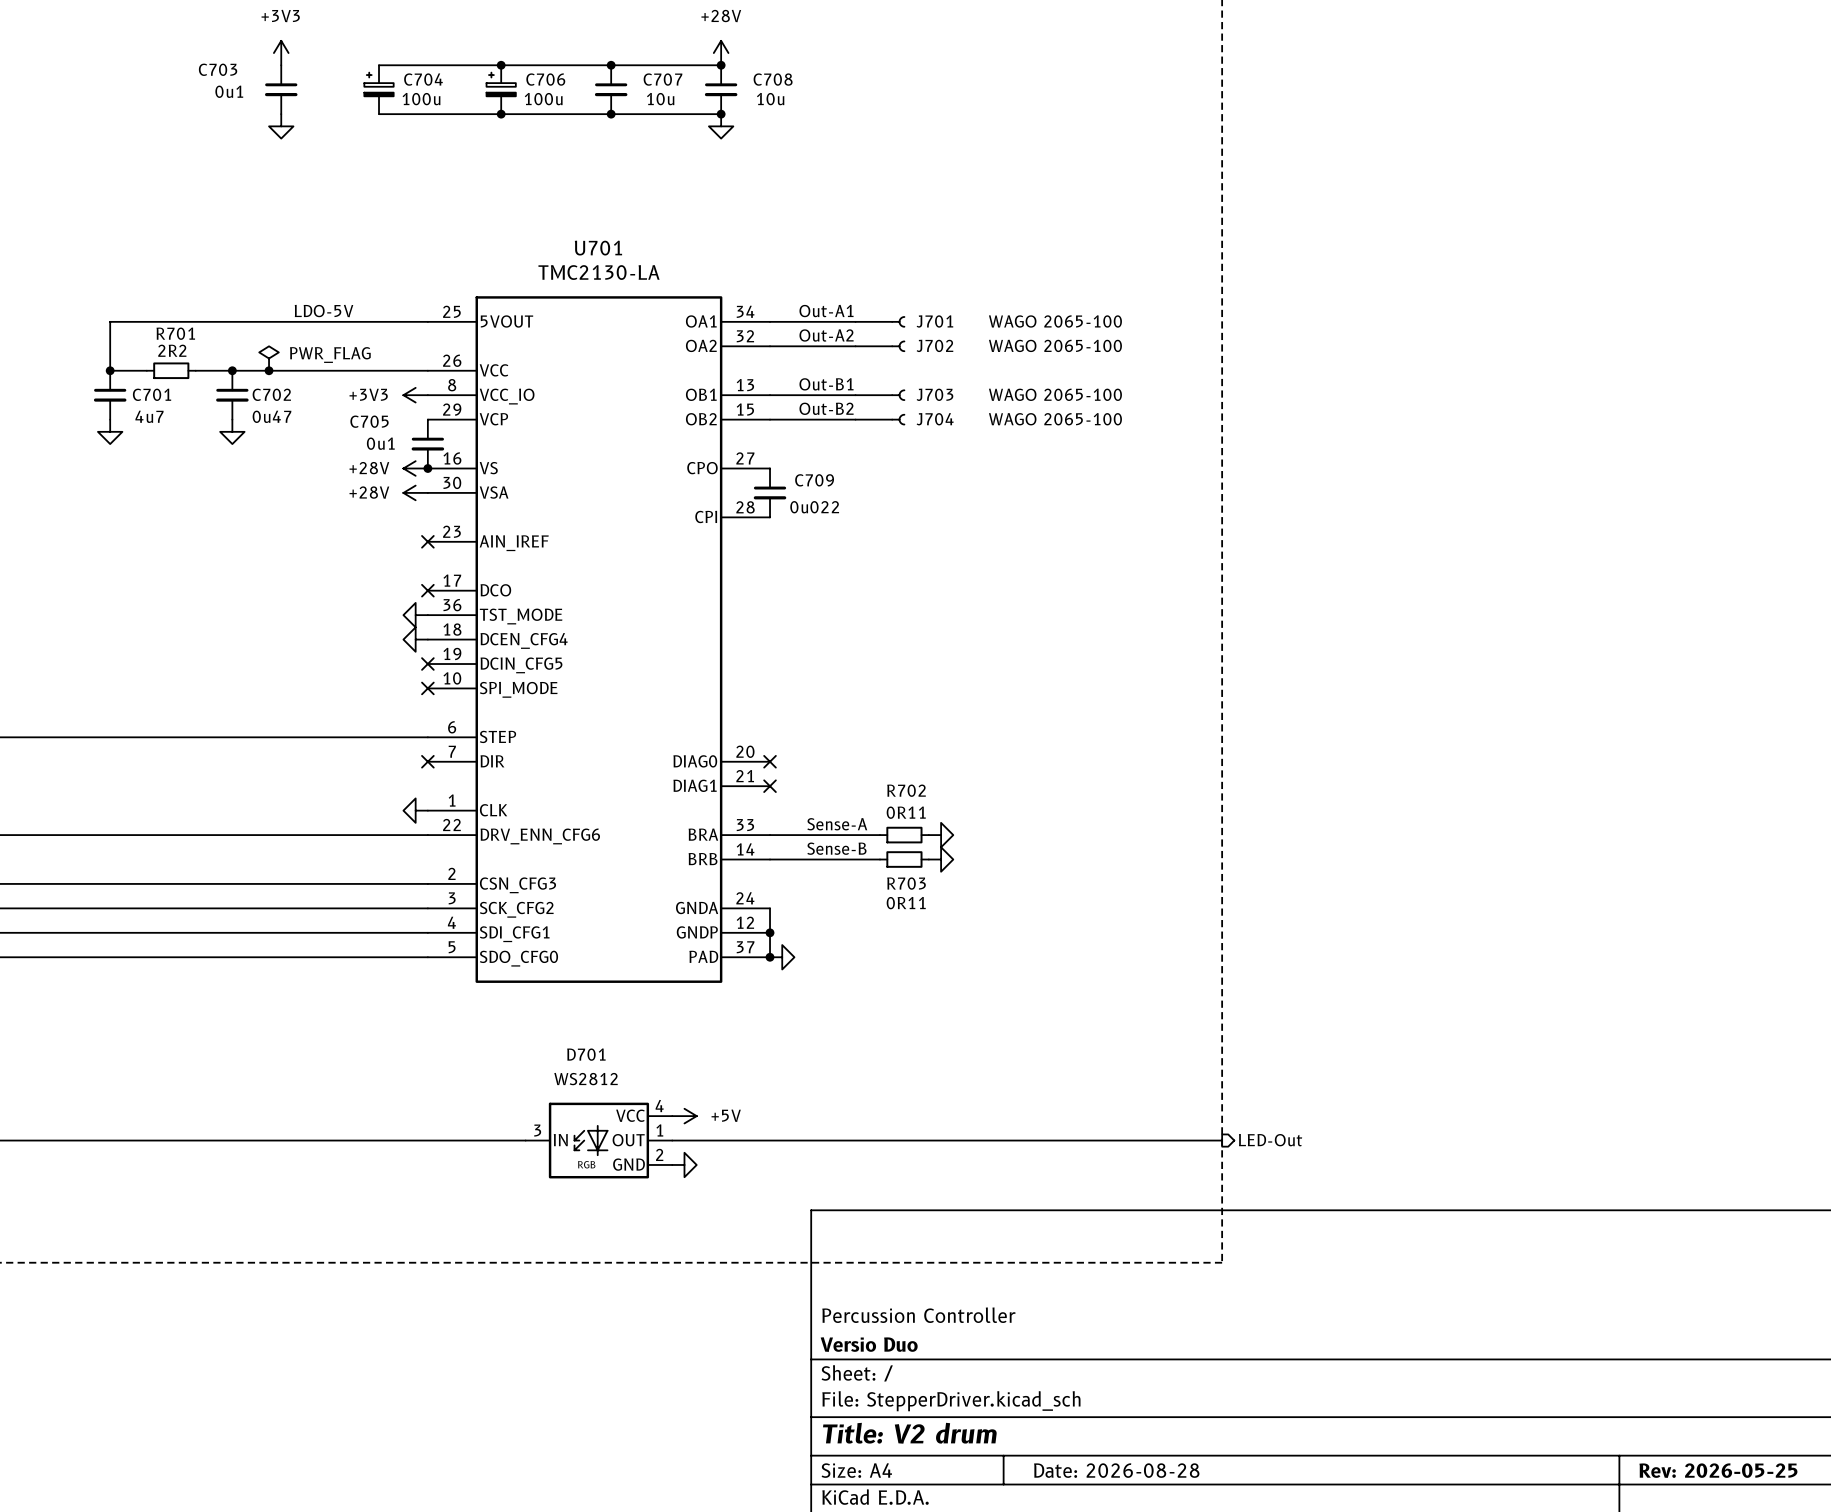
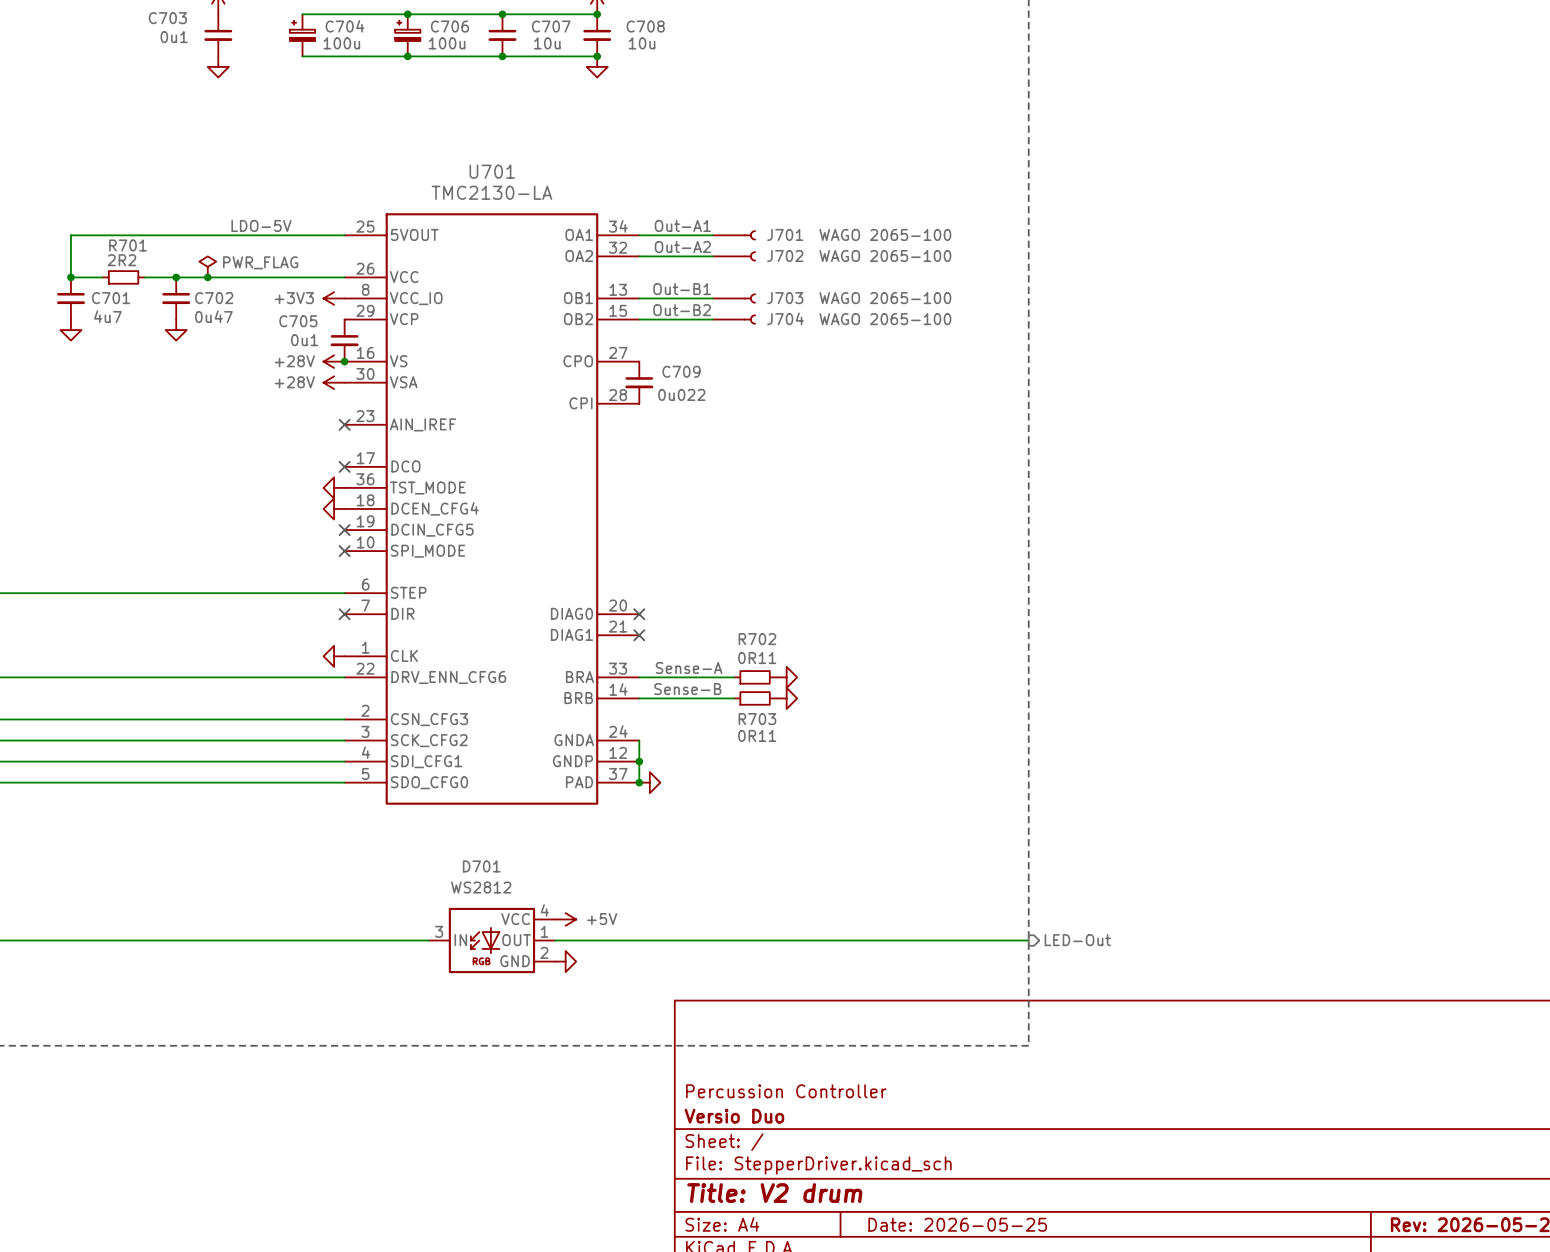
title block: Date: 2026-08-28 (1116, 1470) -> Date: 2026-05-25 (957, 1224)

